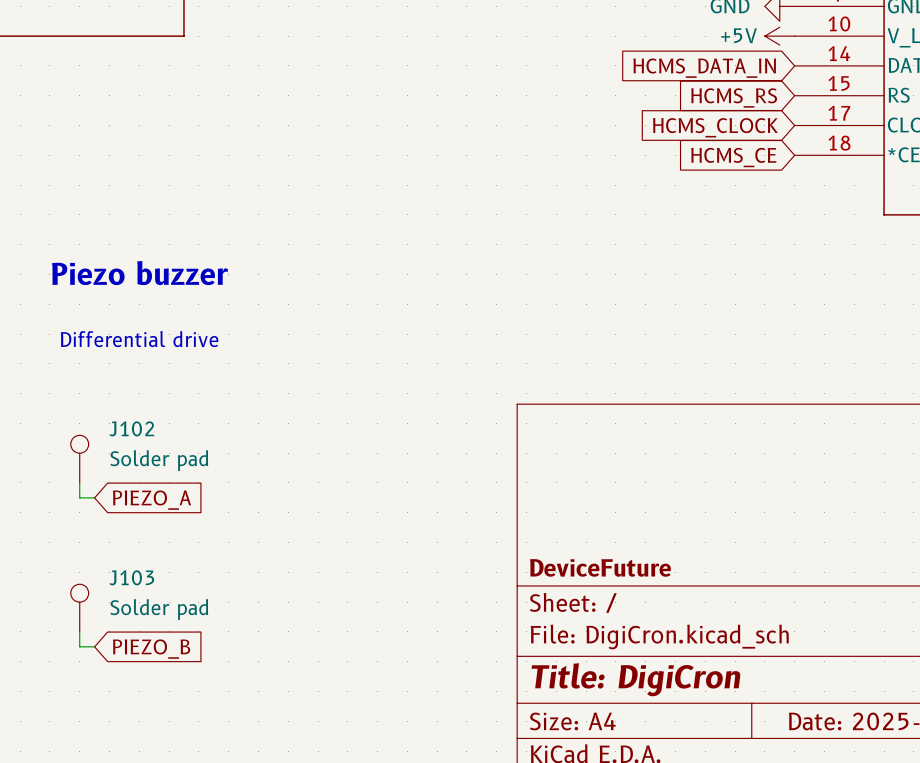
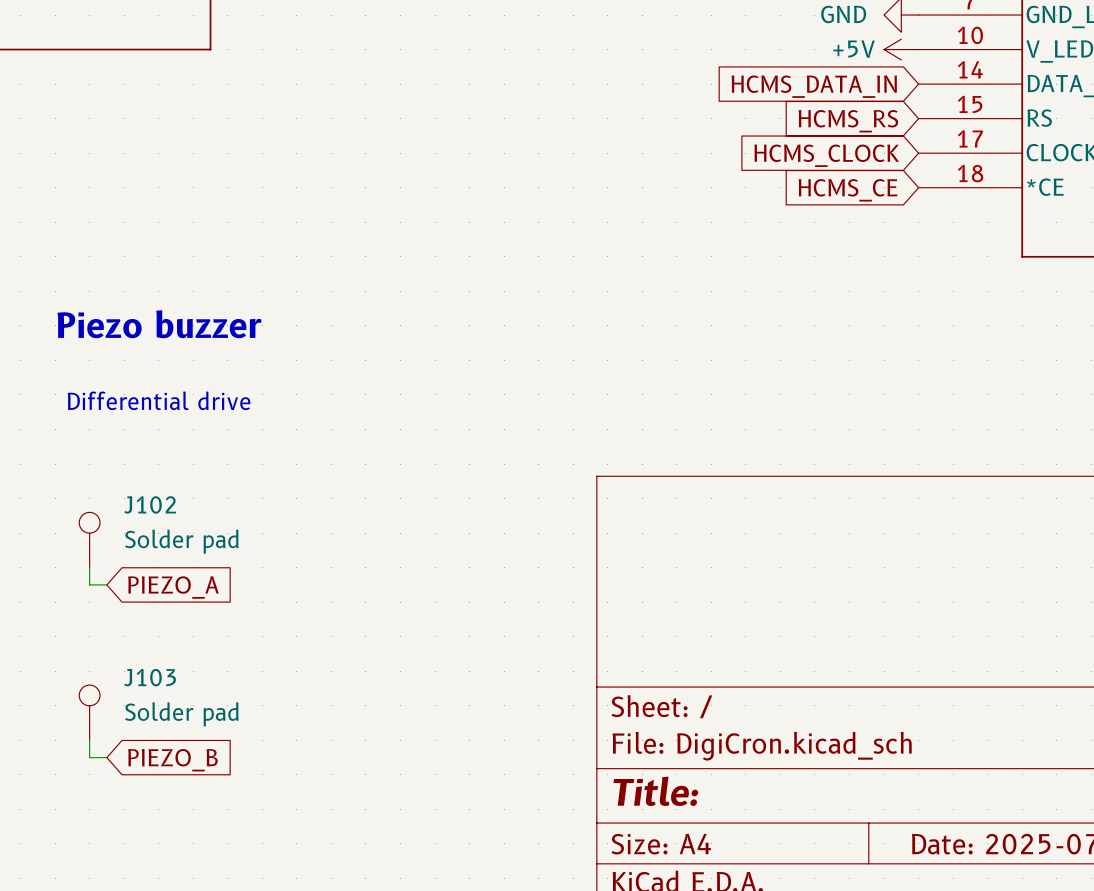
title block: DeviceFuture (600, 567) -> none
title block: Title: DigiCron (635, 679) -> Title: (655, 791)

